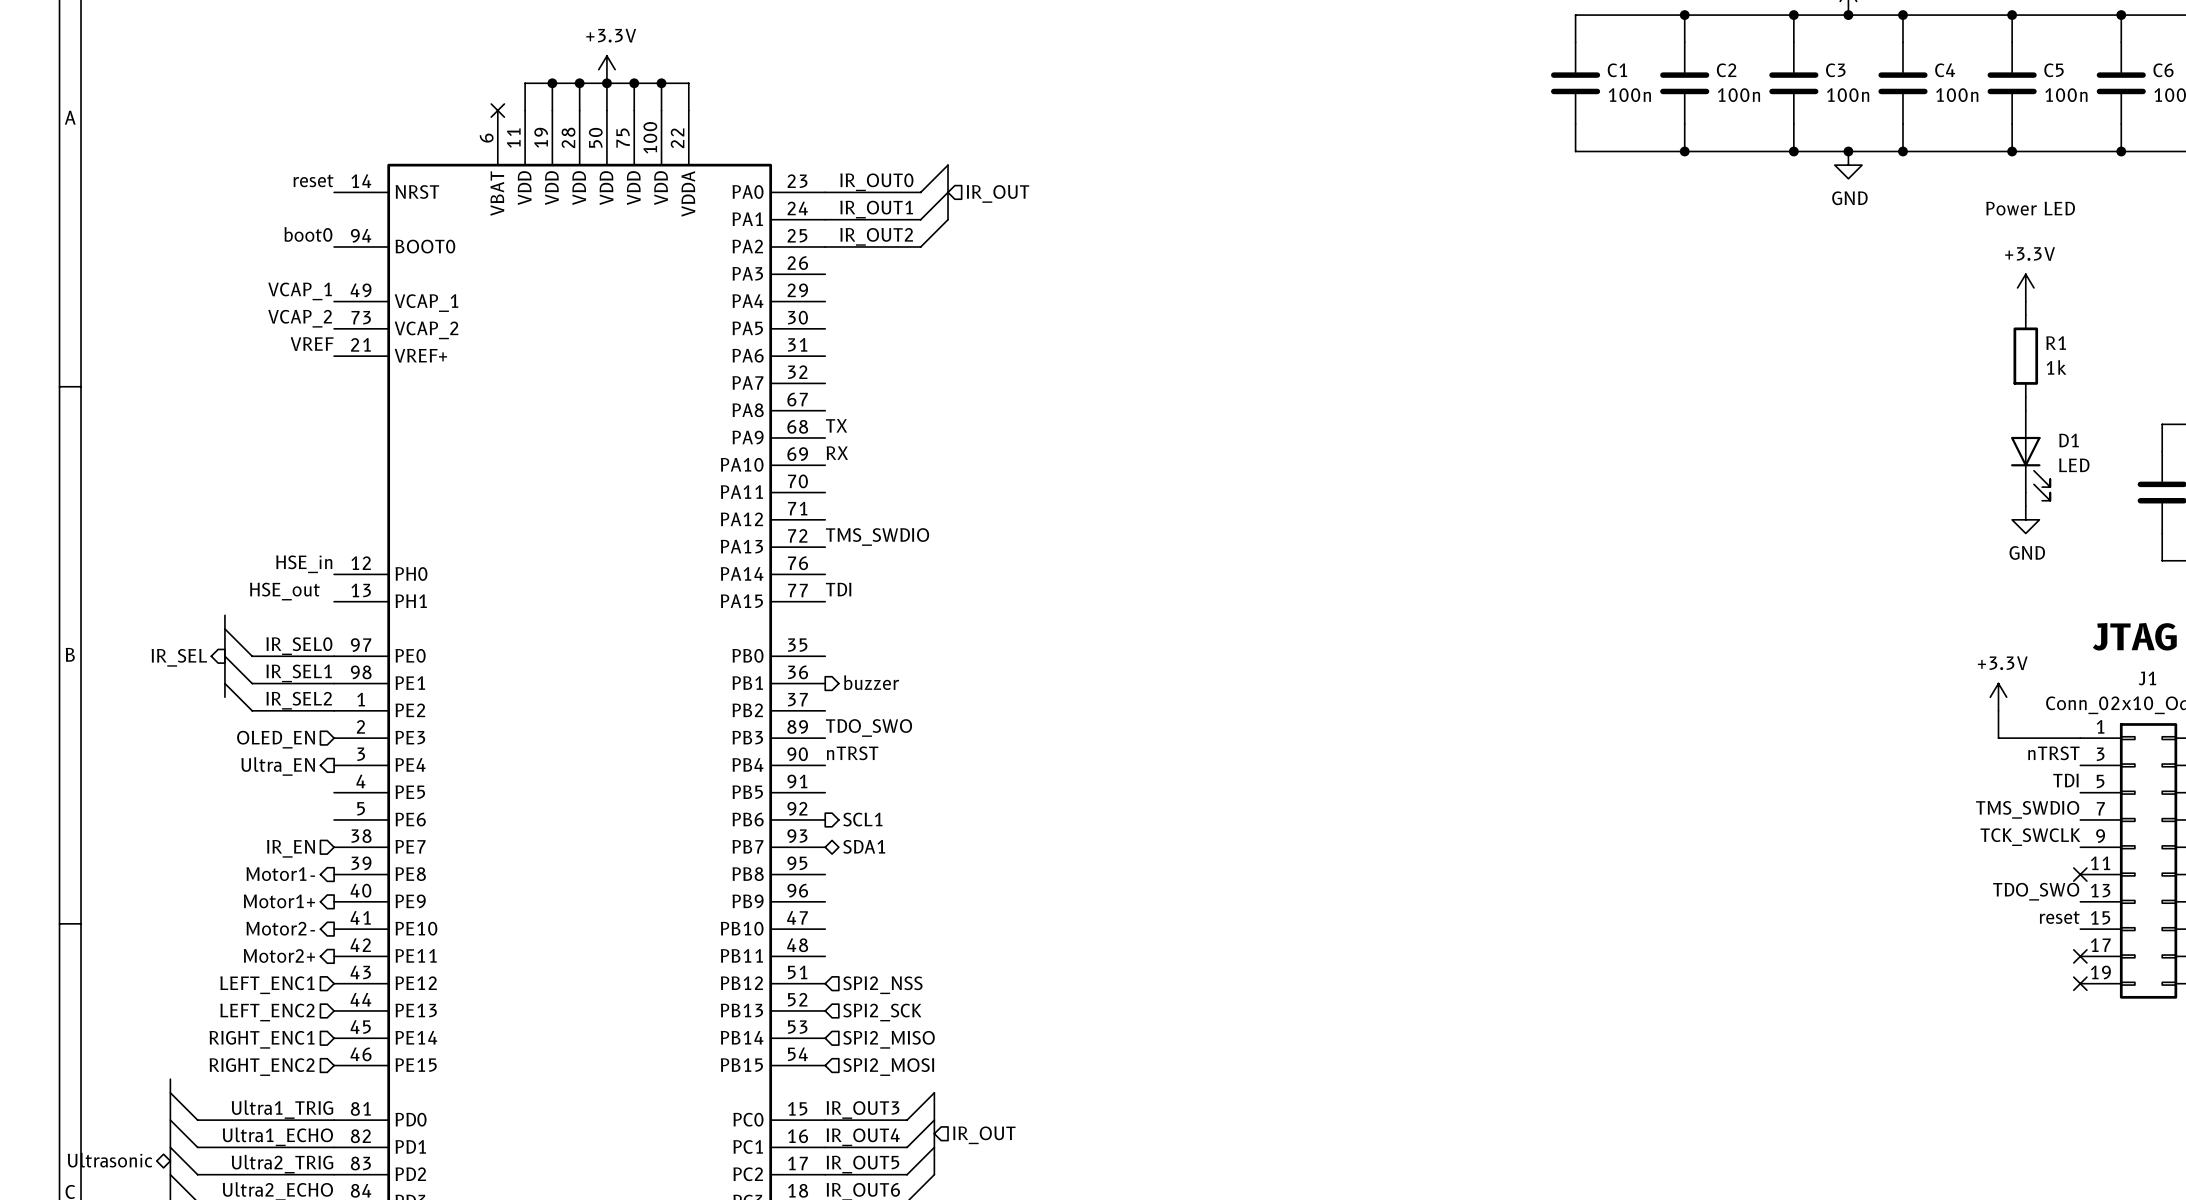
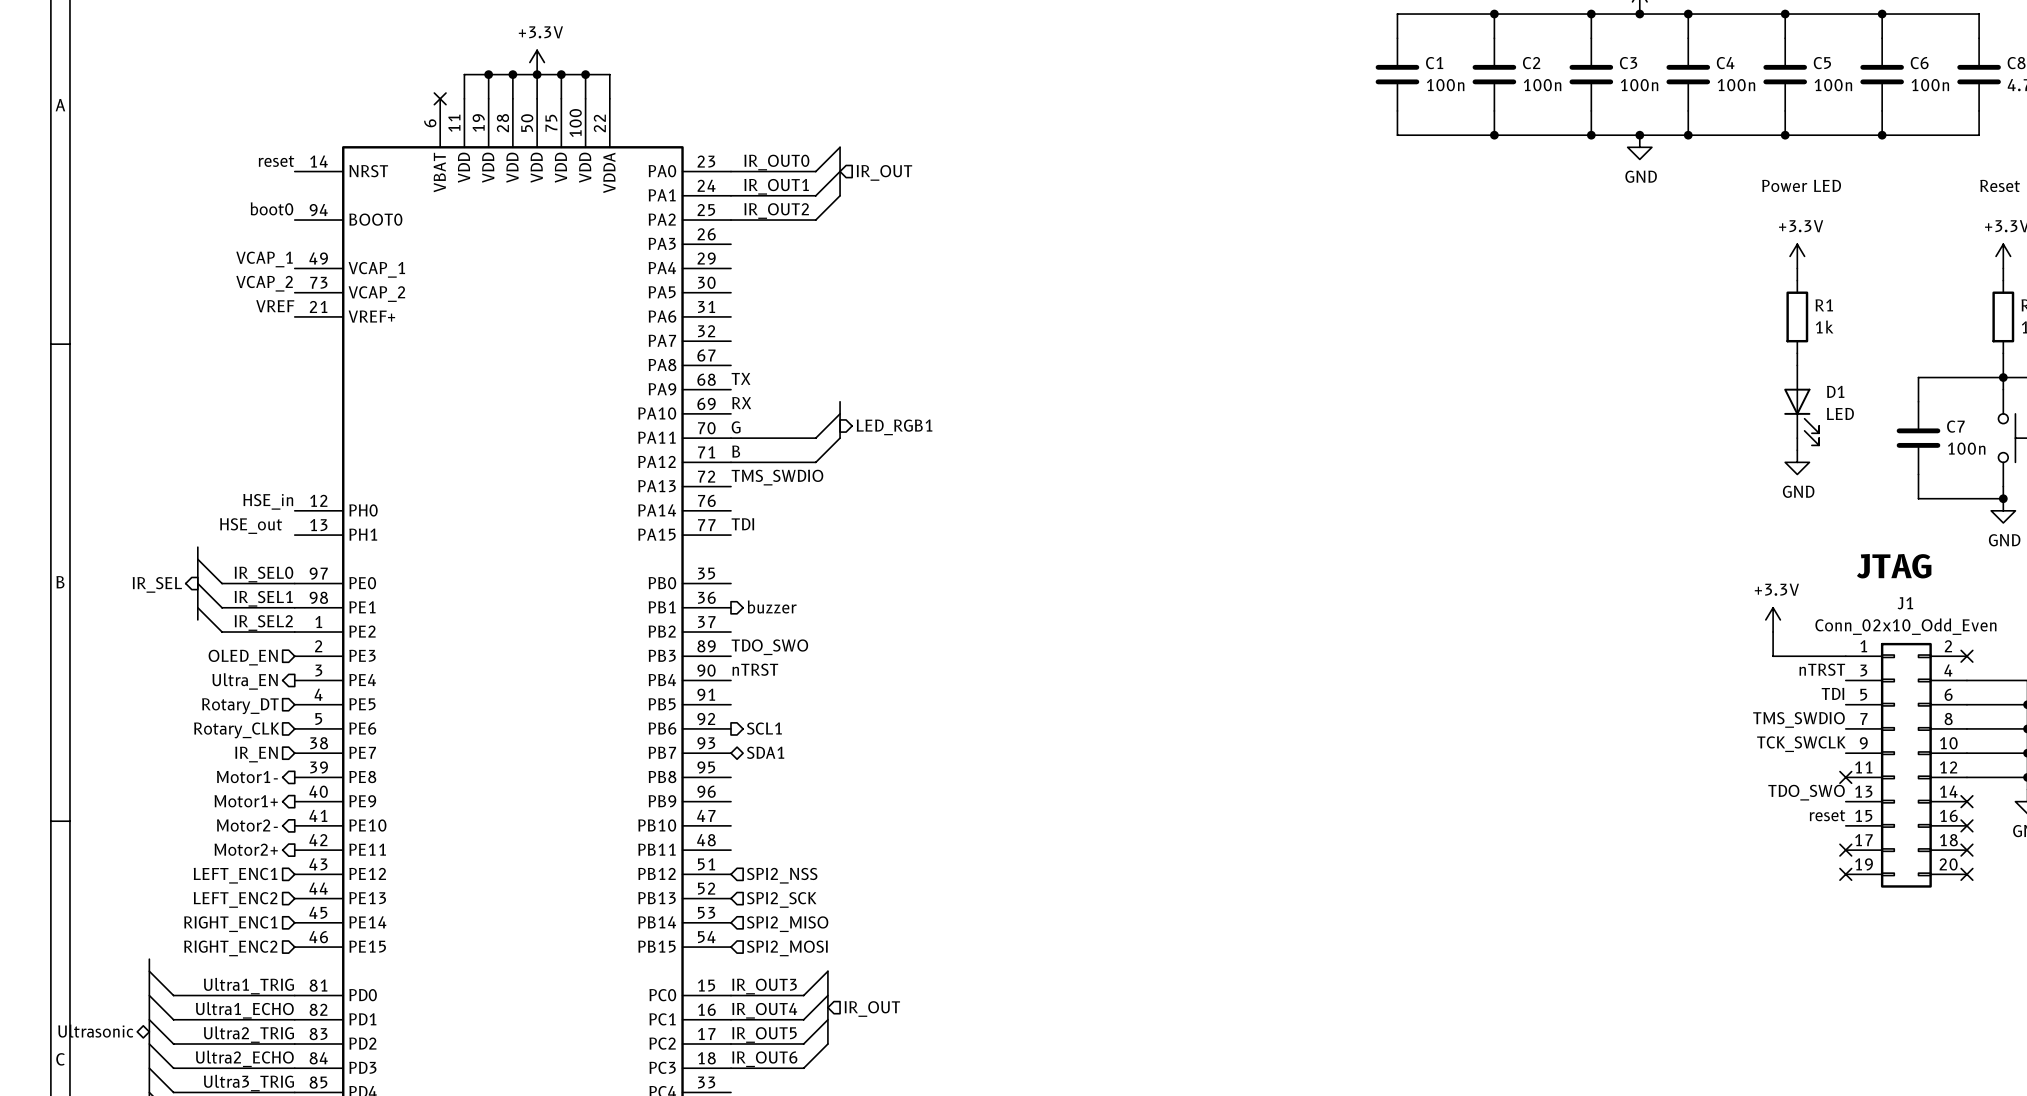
bus: none -> (840, 401) (840, 438)
wire: none -> (840, 413) (815, 438) (730, 438)
label: none -> G (736, 427)
hierarchical label: none -> LED_RGB1 (894, 427)
wire: none -> (840, 438) (815, 462) (730, 462)
label: none -> B (736, 451)
hierarchical label: none -> Rotary_DT (240, 706)
hierarchical label: none -> Rotary_CLK (236, 730)

